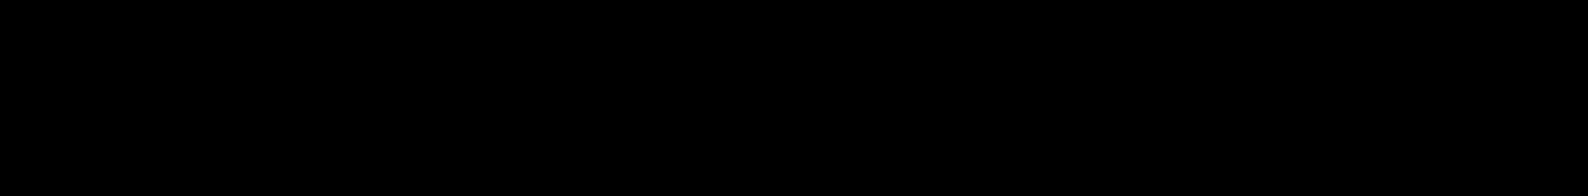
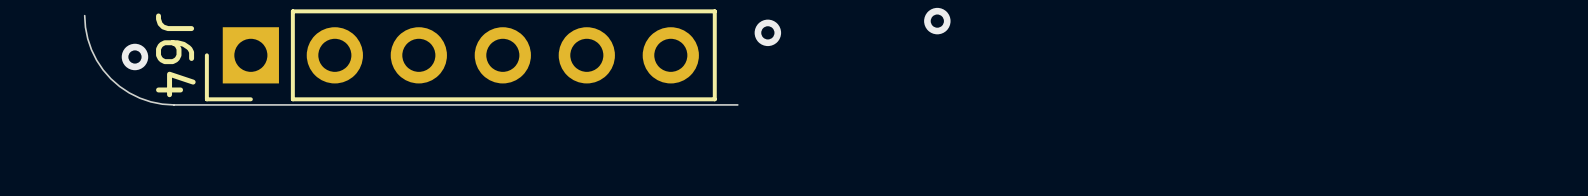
board edge: none -> (84, 15) (85, 27) (91, 49) (96, 60) (110, 78) (119, 86) (139, 98) (162, 104) (737, 104)
via: none -> (937, 21)
via: none -> (767, 32)
J64: none -> (460, 55)
via: none -> (134, 56)

